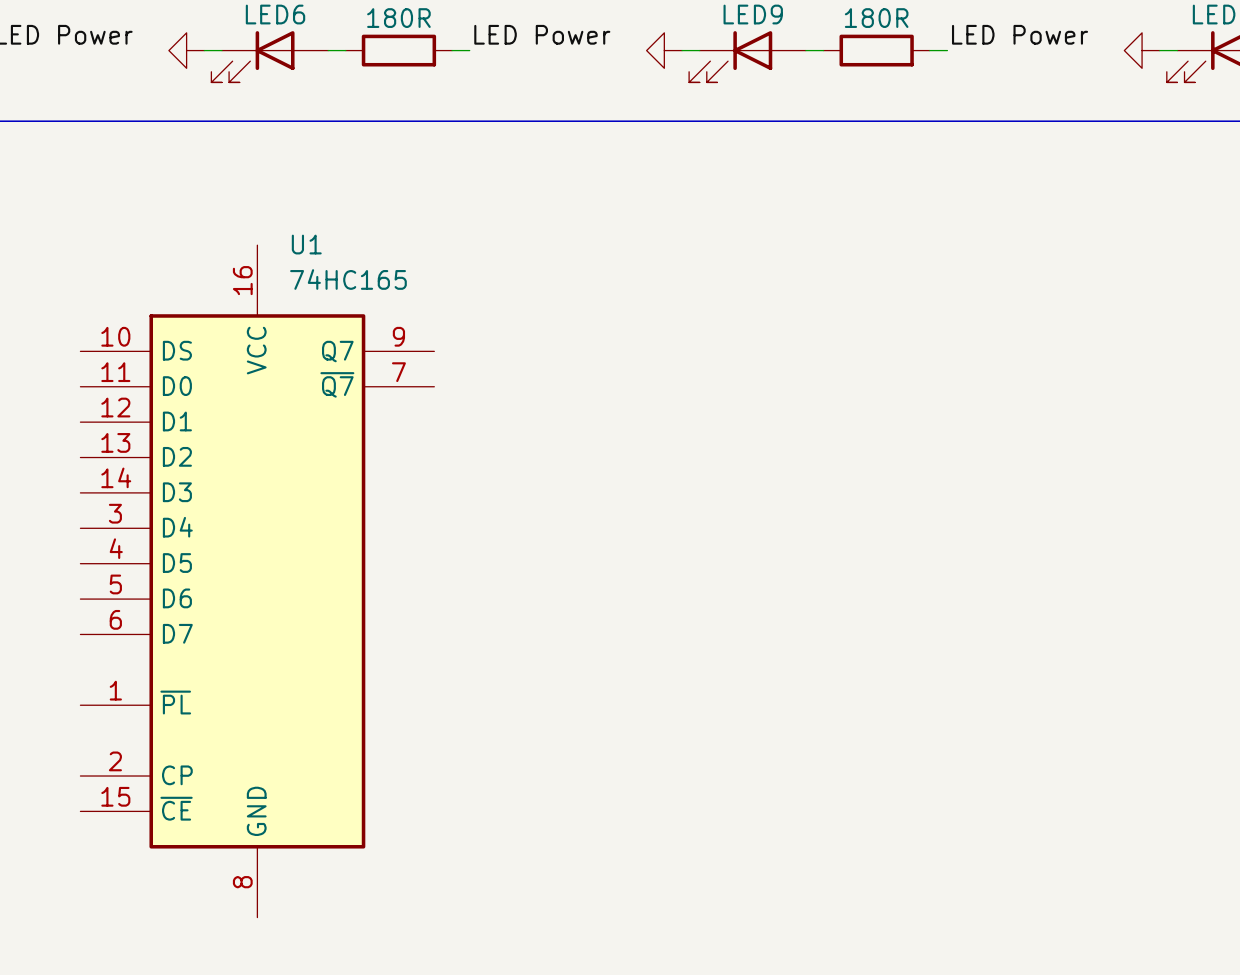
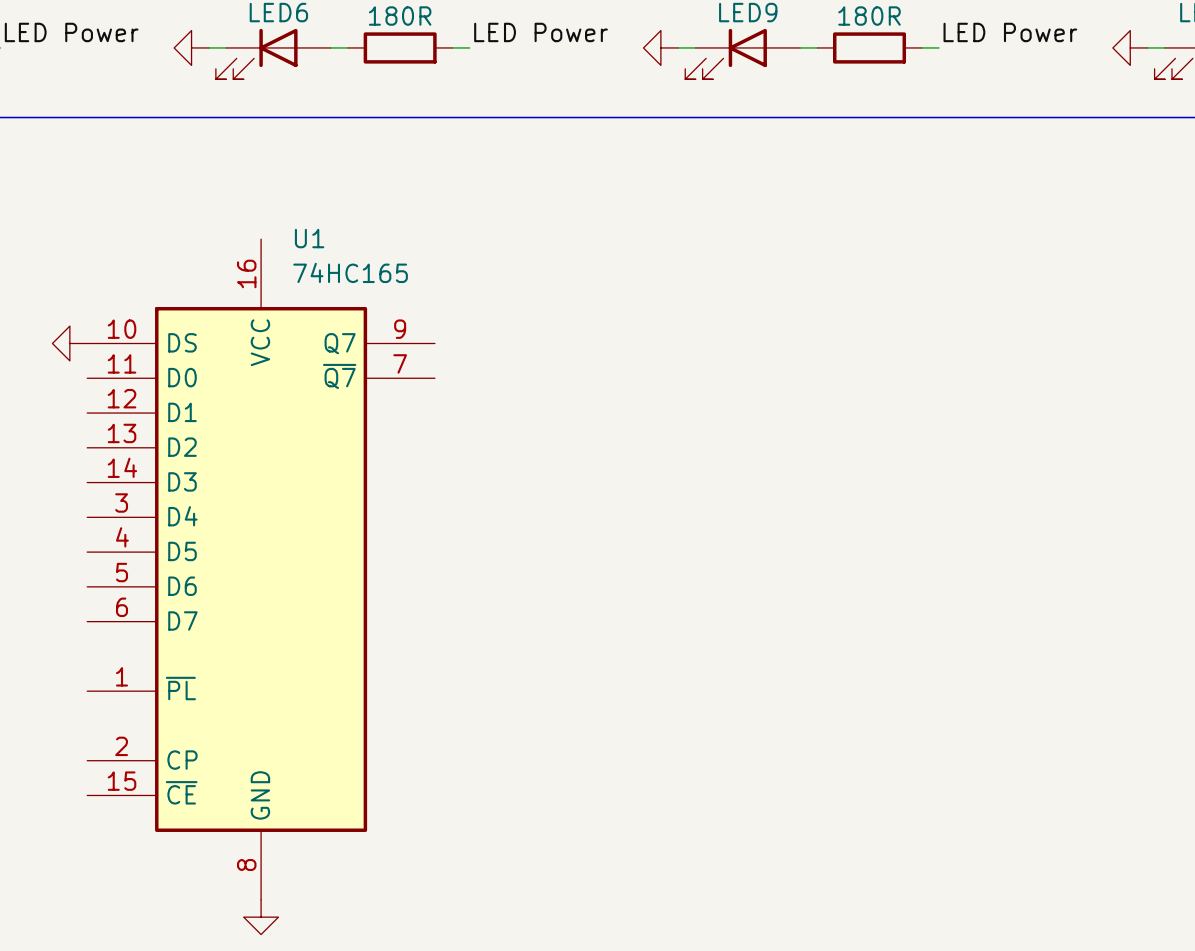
power symbol: none -> (69, 343)
power symbol: none -> (261, 917)

